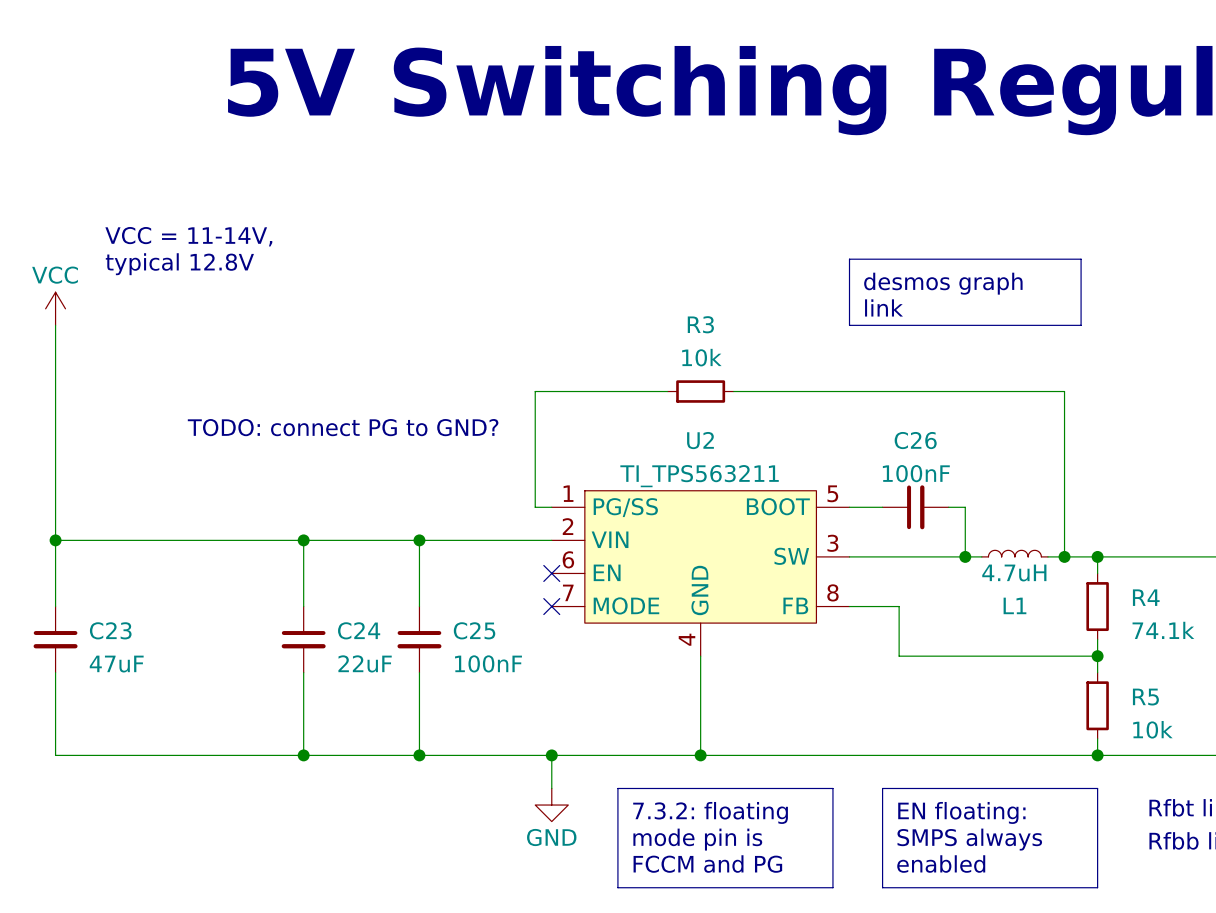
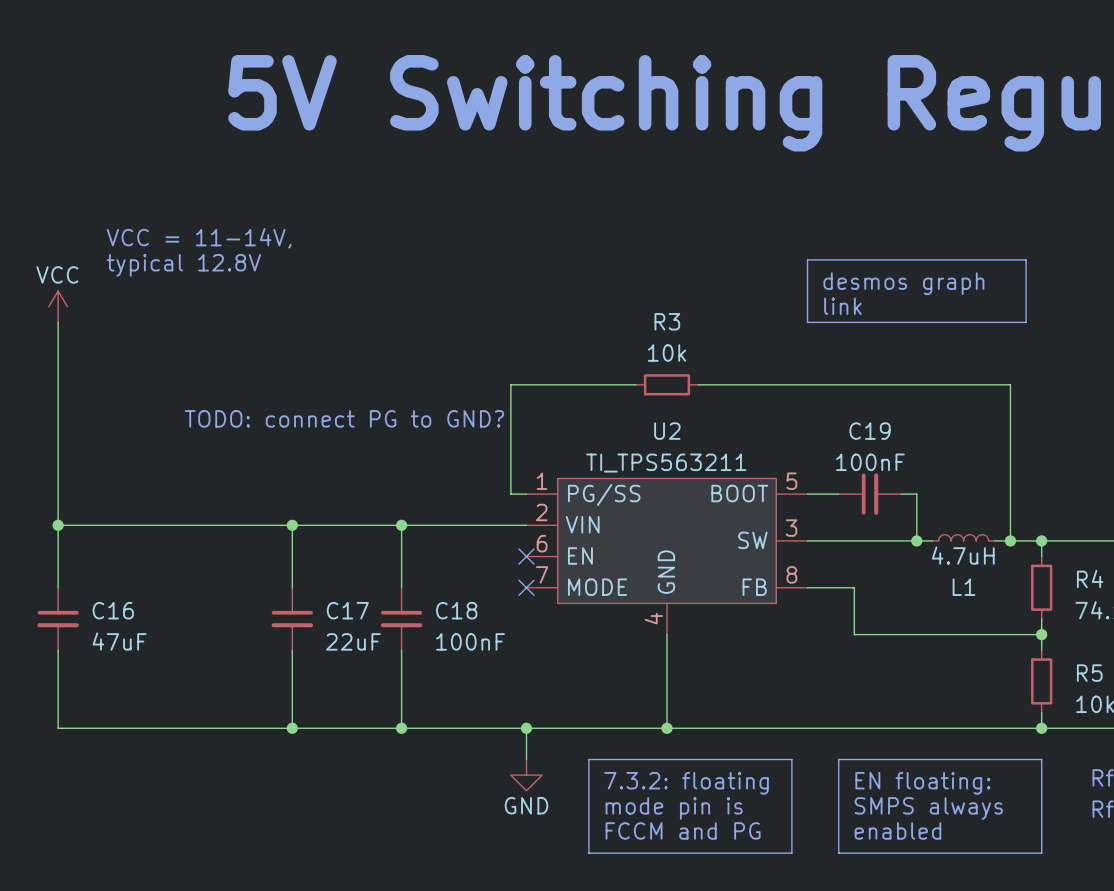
C26 name: C26 (915, 440) -> C19 (870, 431)
C23 name: C23 (110, 630) -> C16 (113, 610)
C24 name: C24 (359, 630) -> C17 (347, 610)
C25 name: C25 (474, 630) -> C18 (456, 610)

